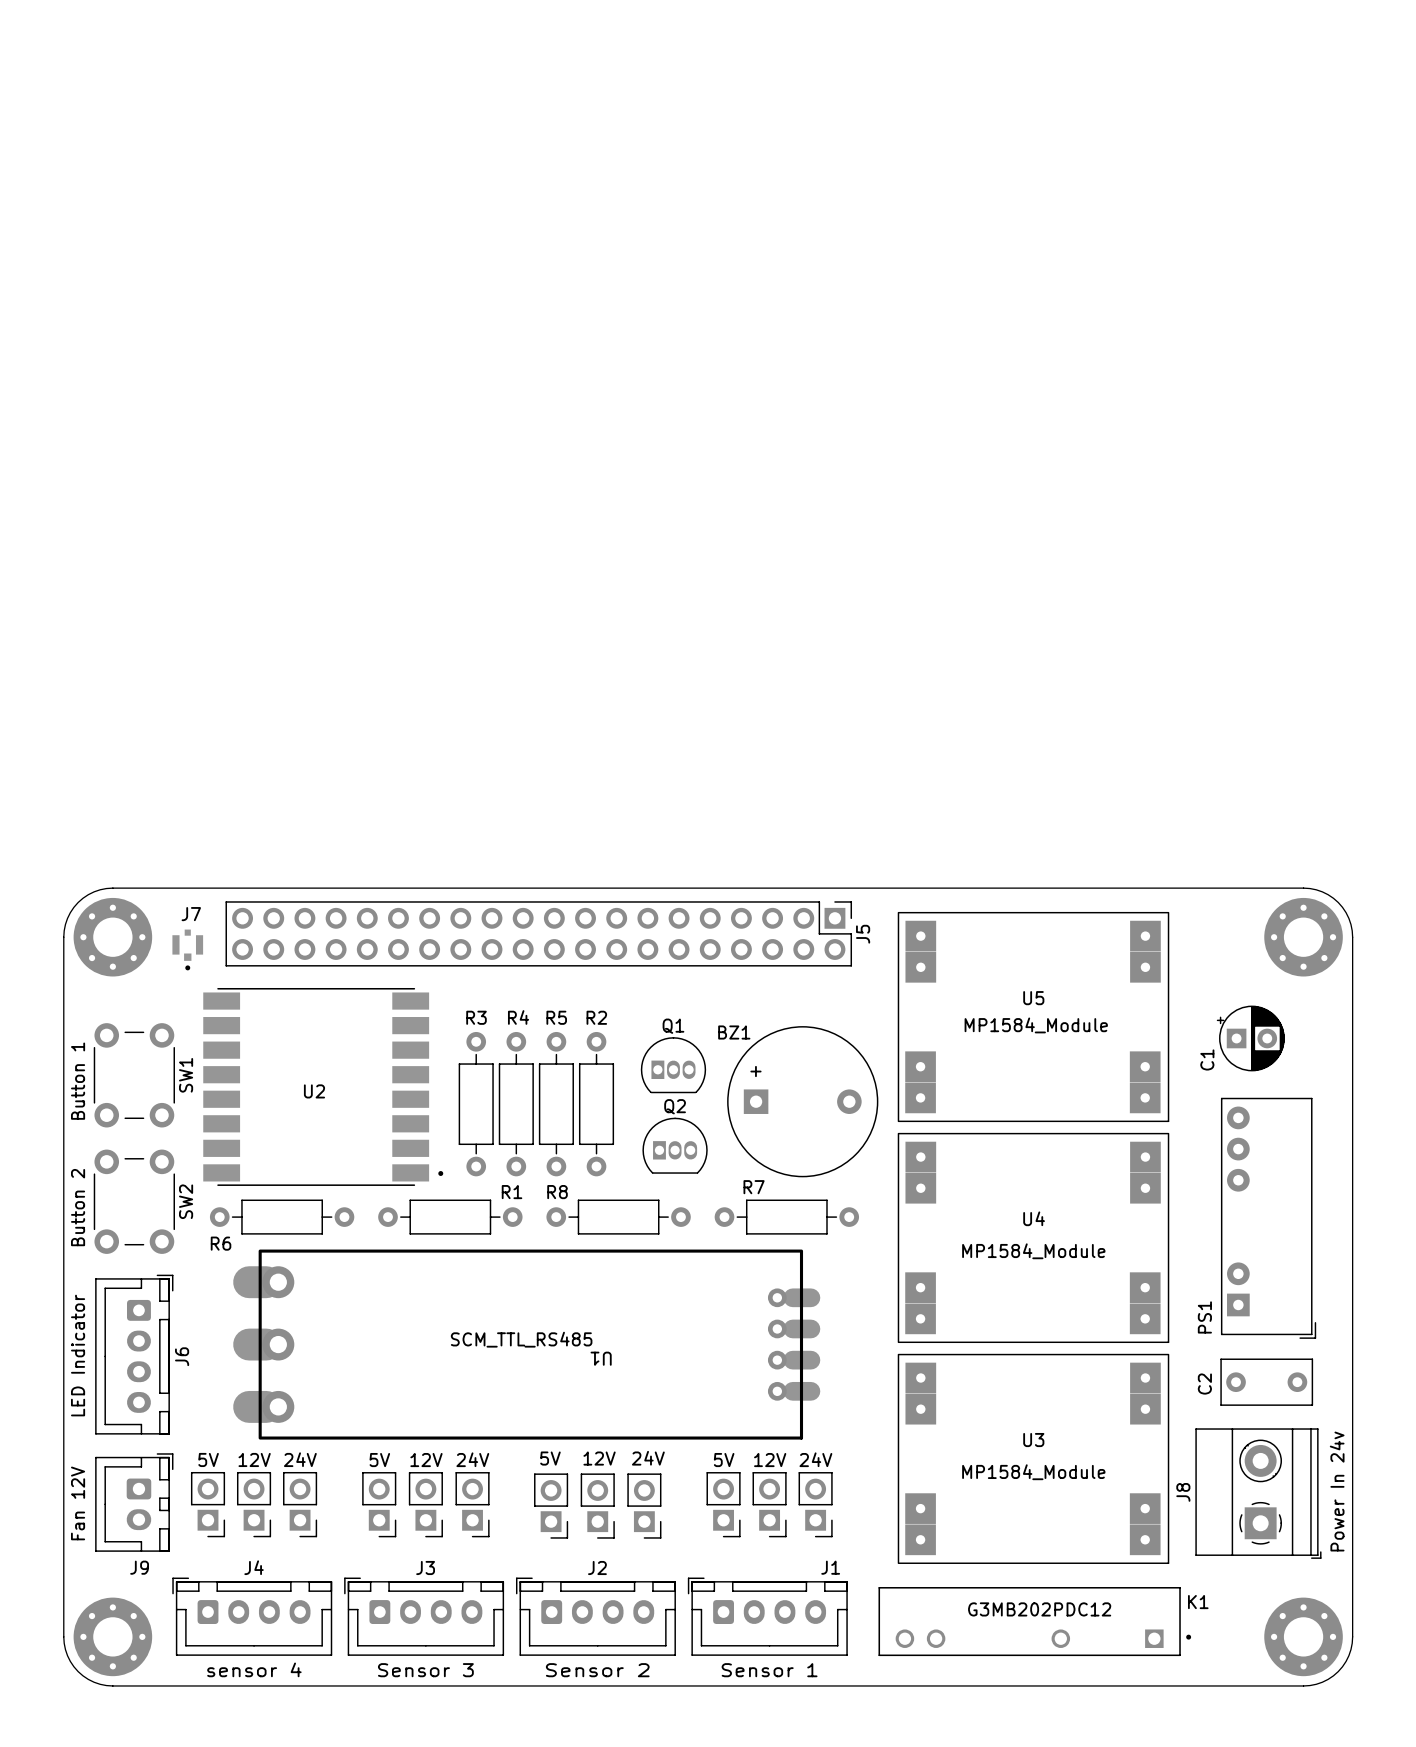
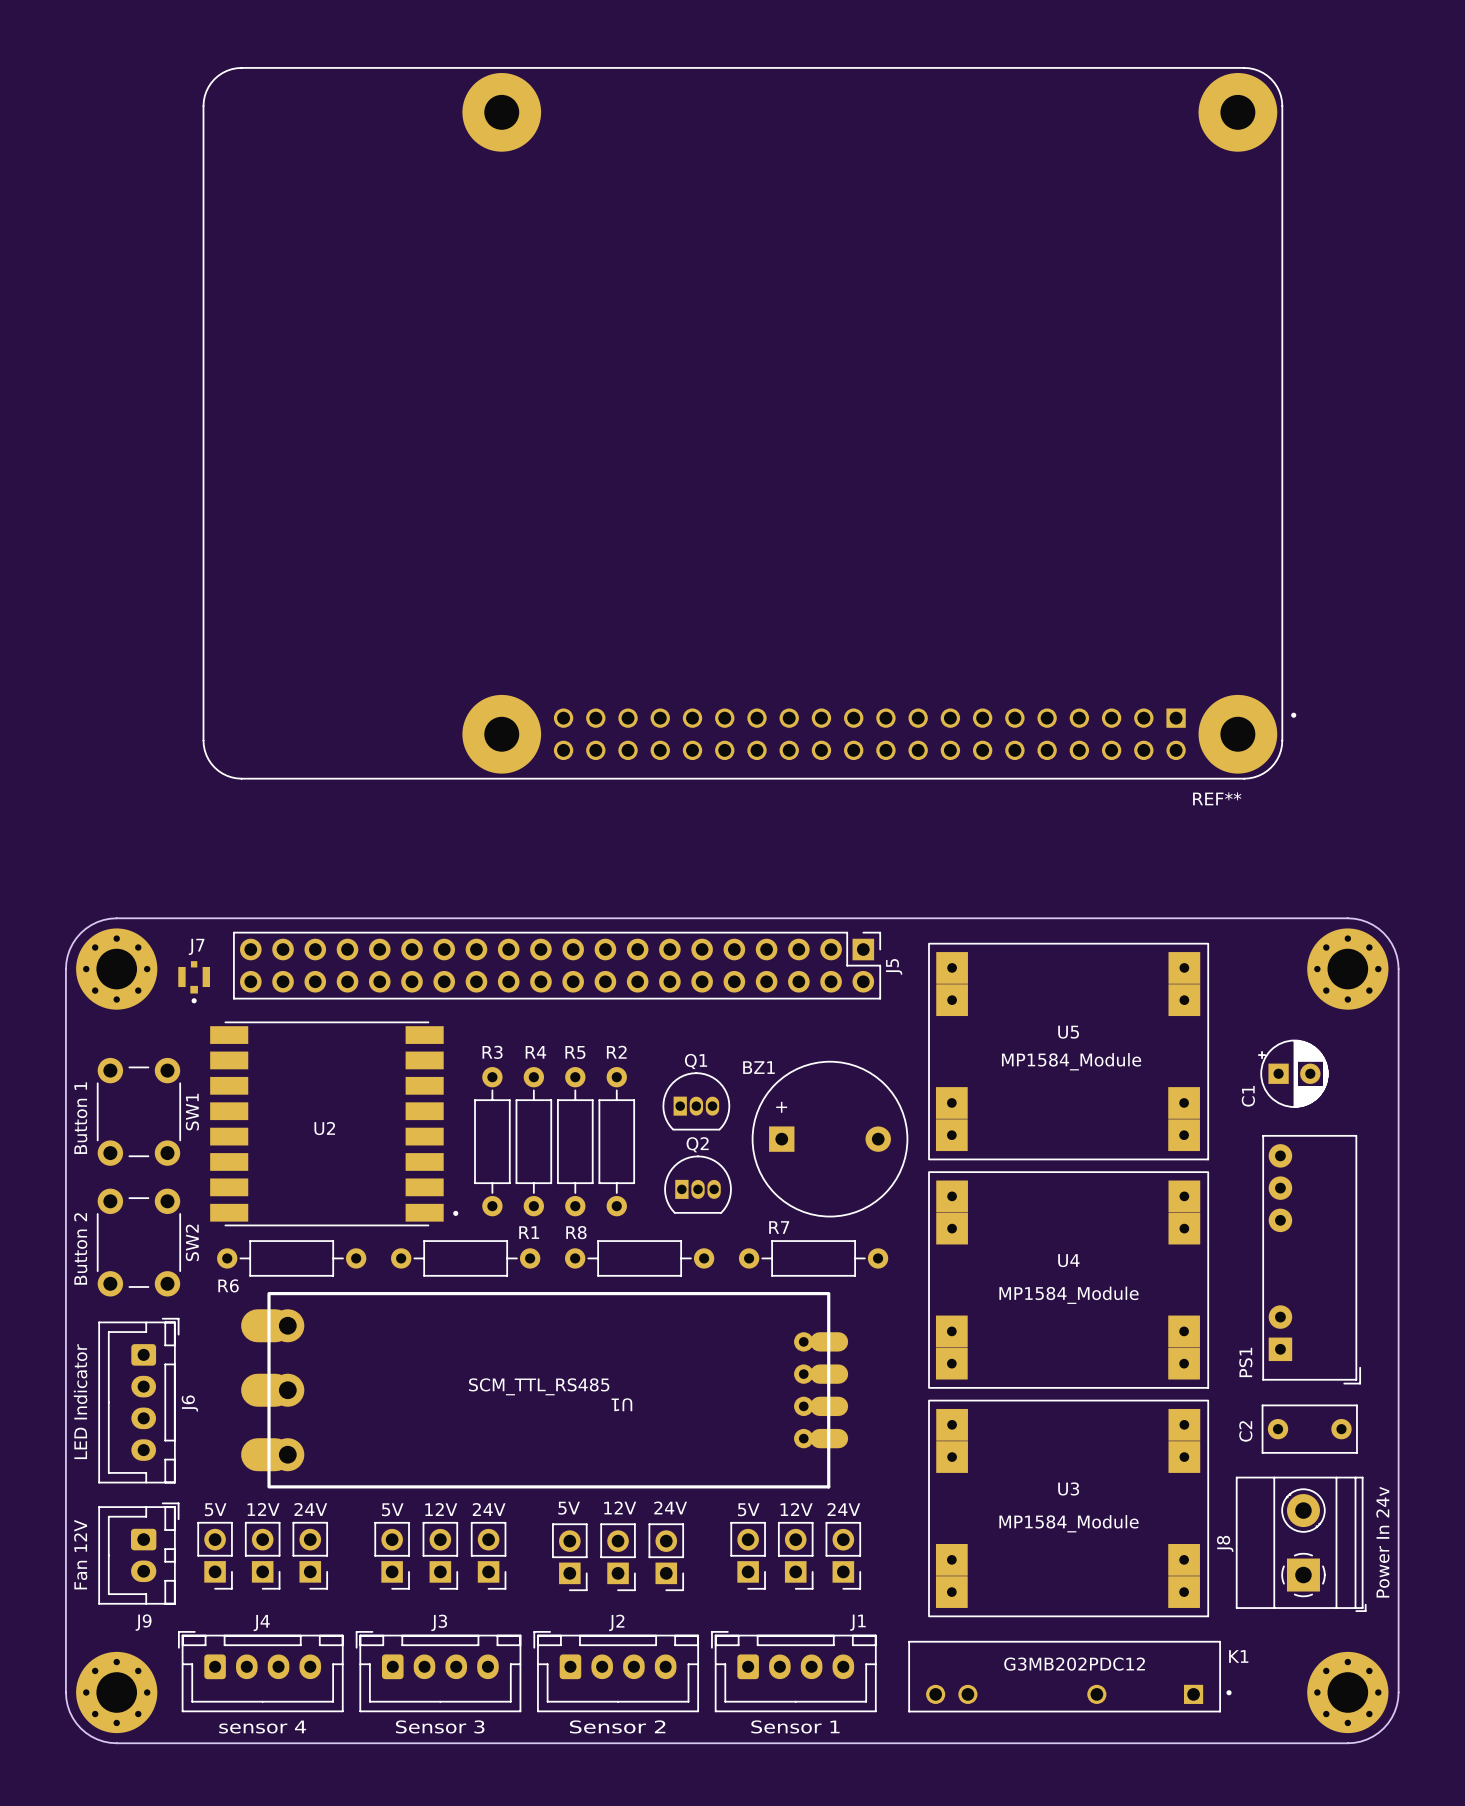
REF**: none -> (749, 423)

